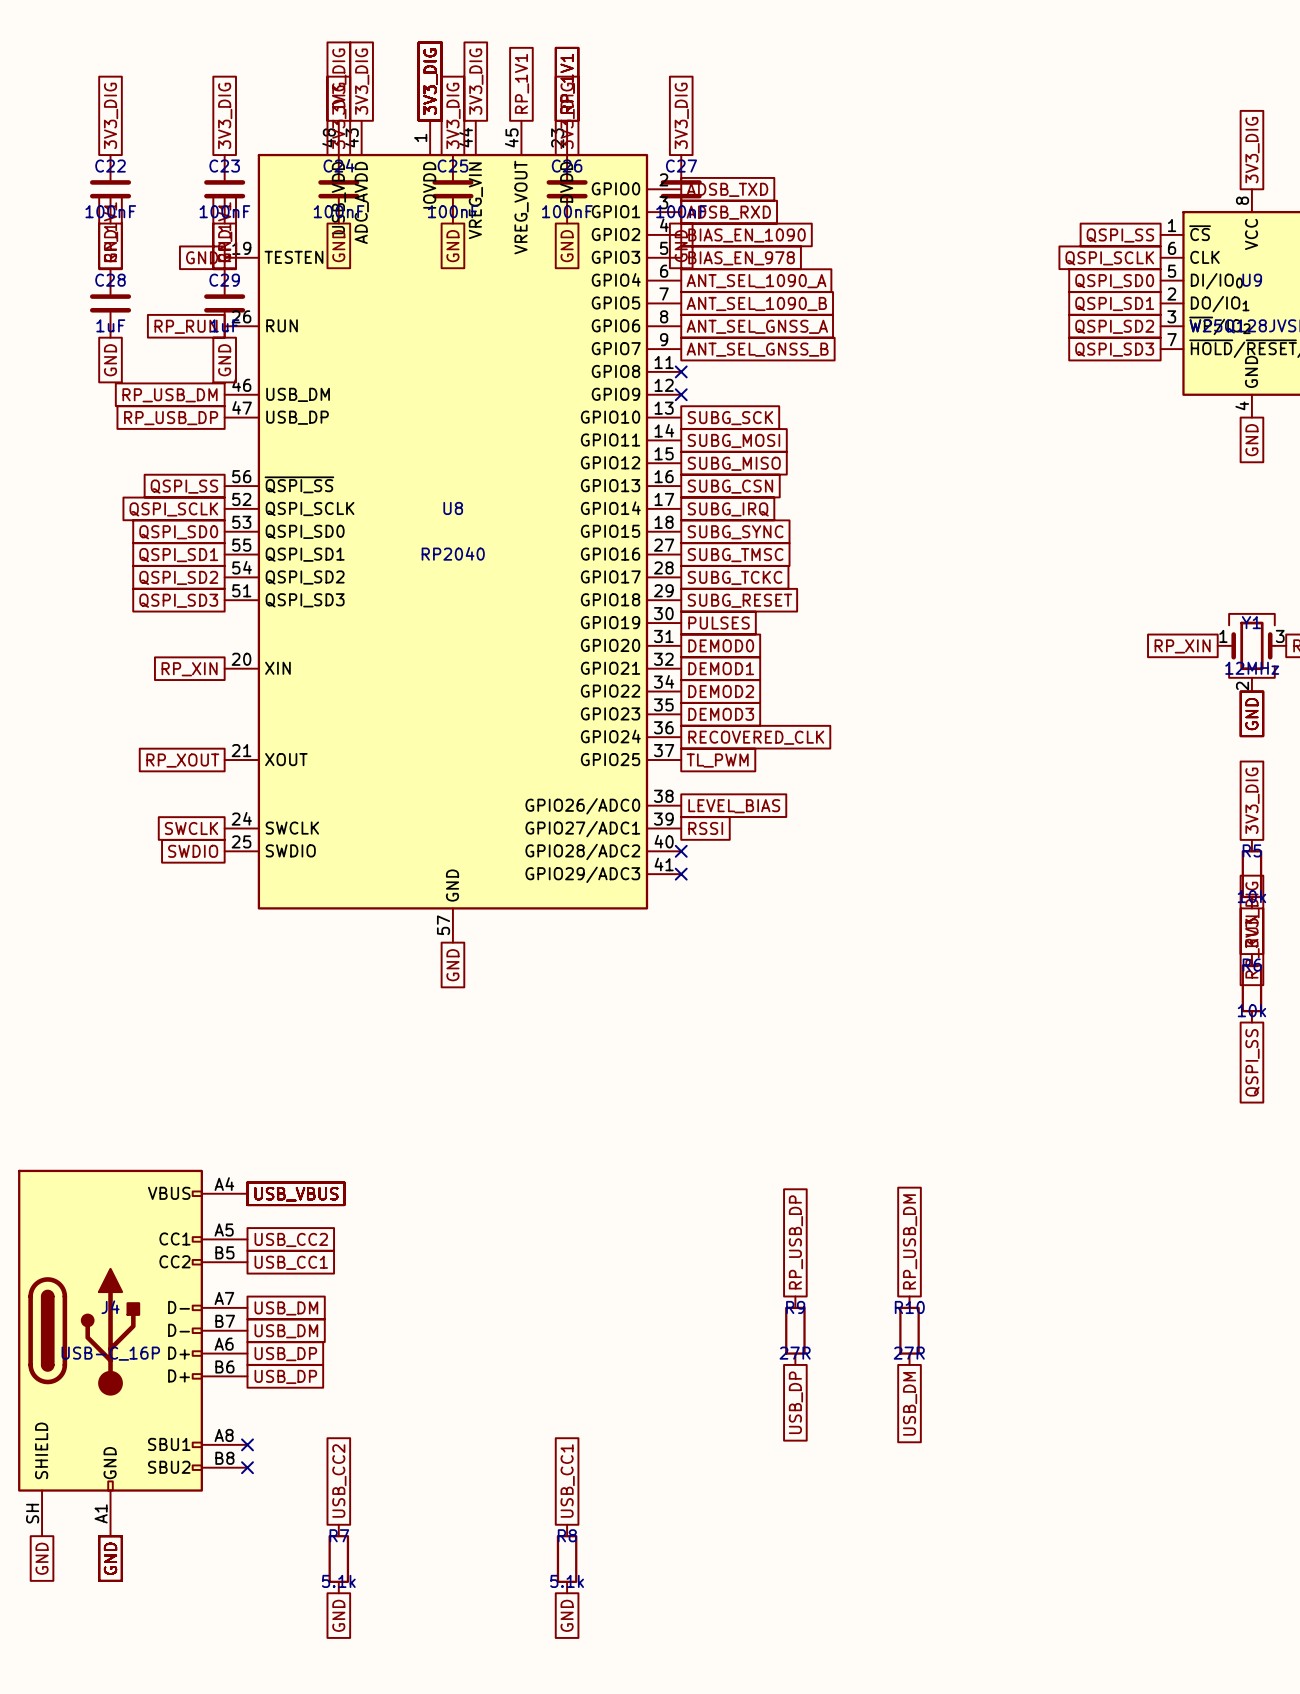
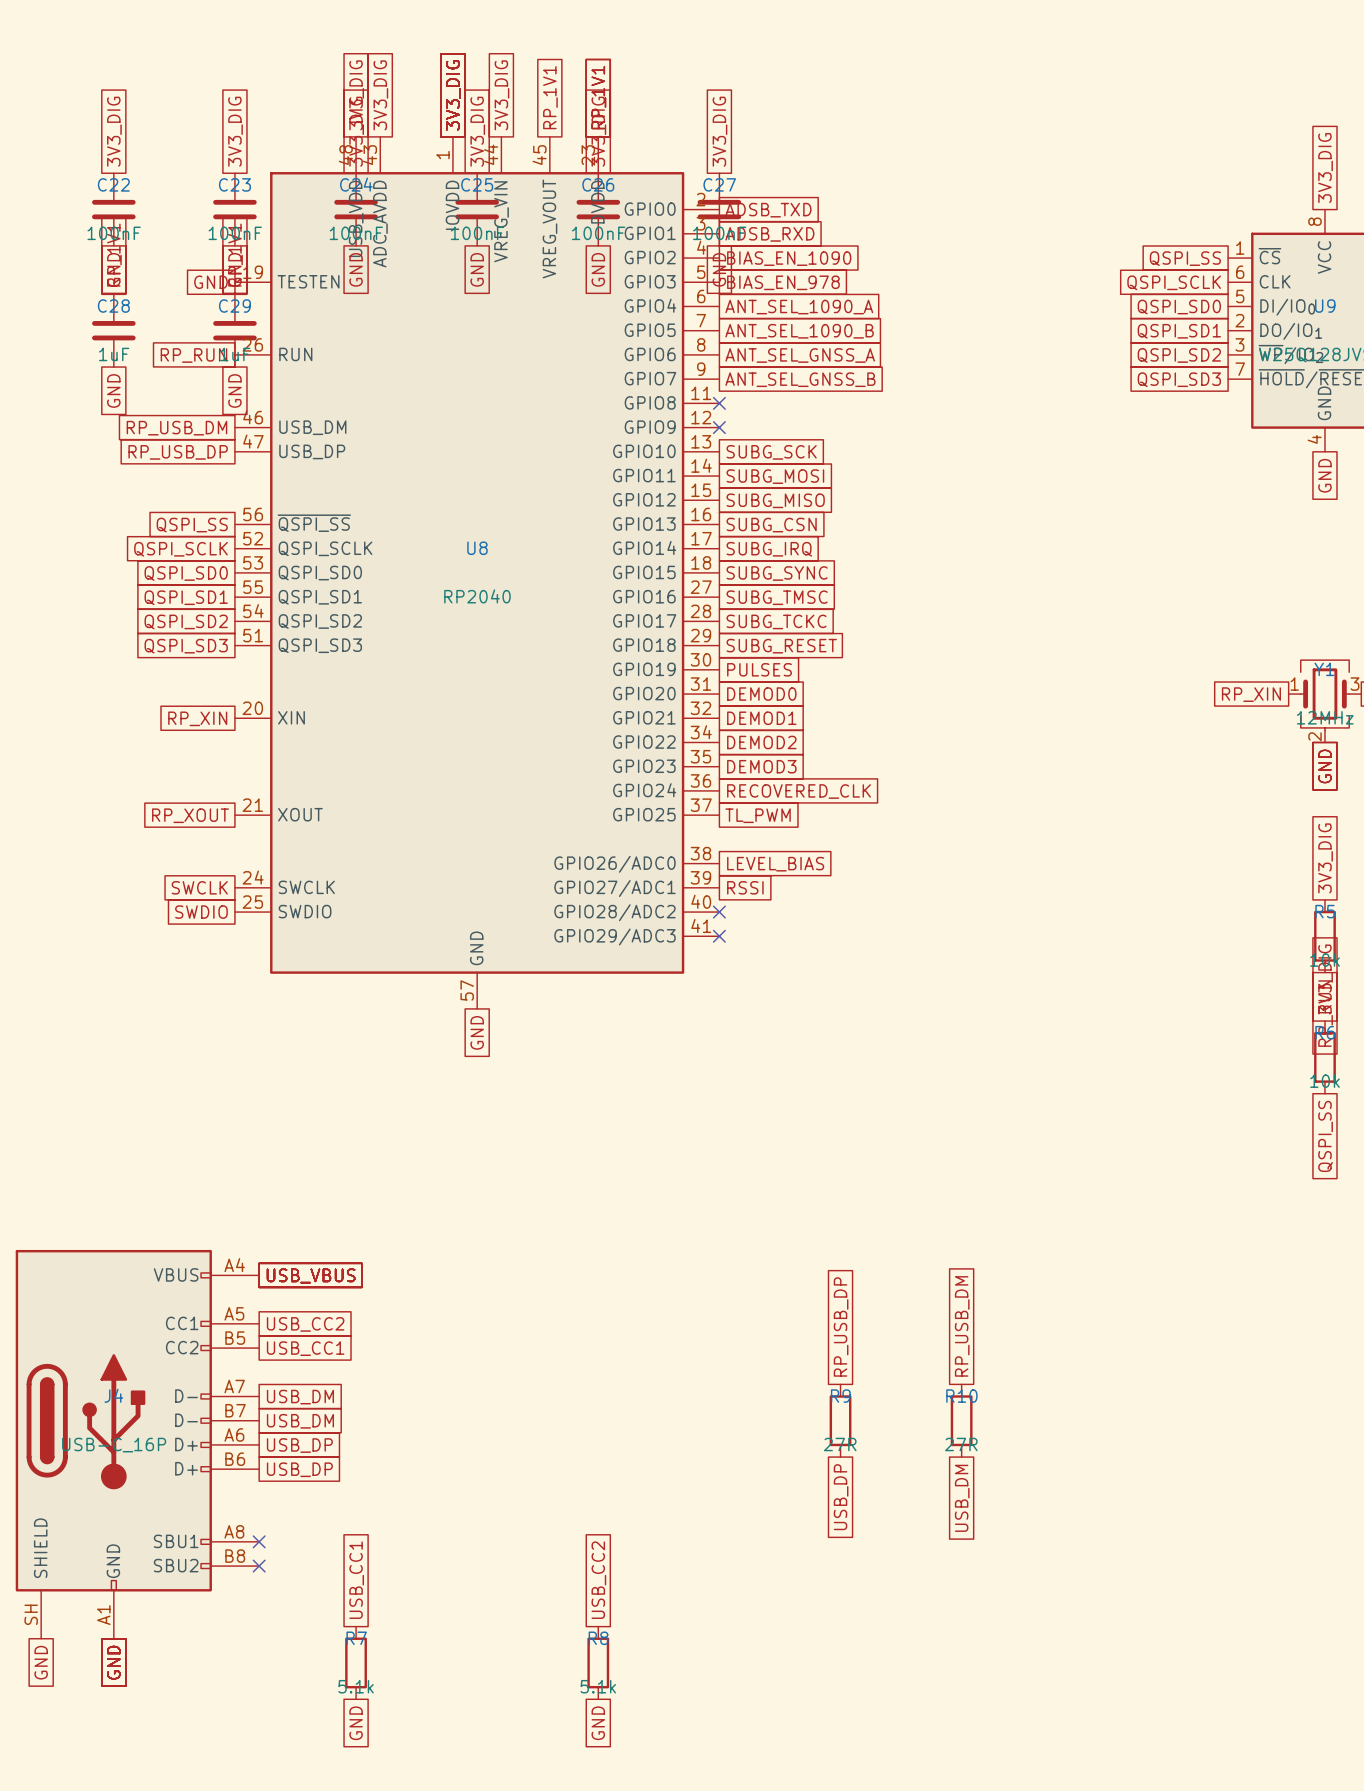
global label: USB_CC2 (339, 1480) -> USB_CC1 (356, 1580)
global label: USB_CC1 (567, 1480) -> USB_CC2 (598, 1580)

